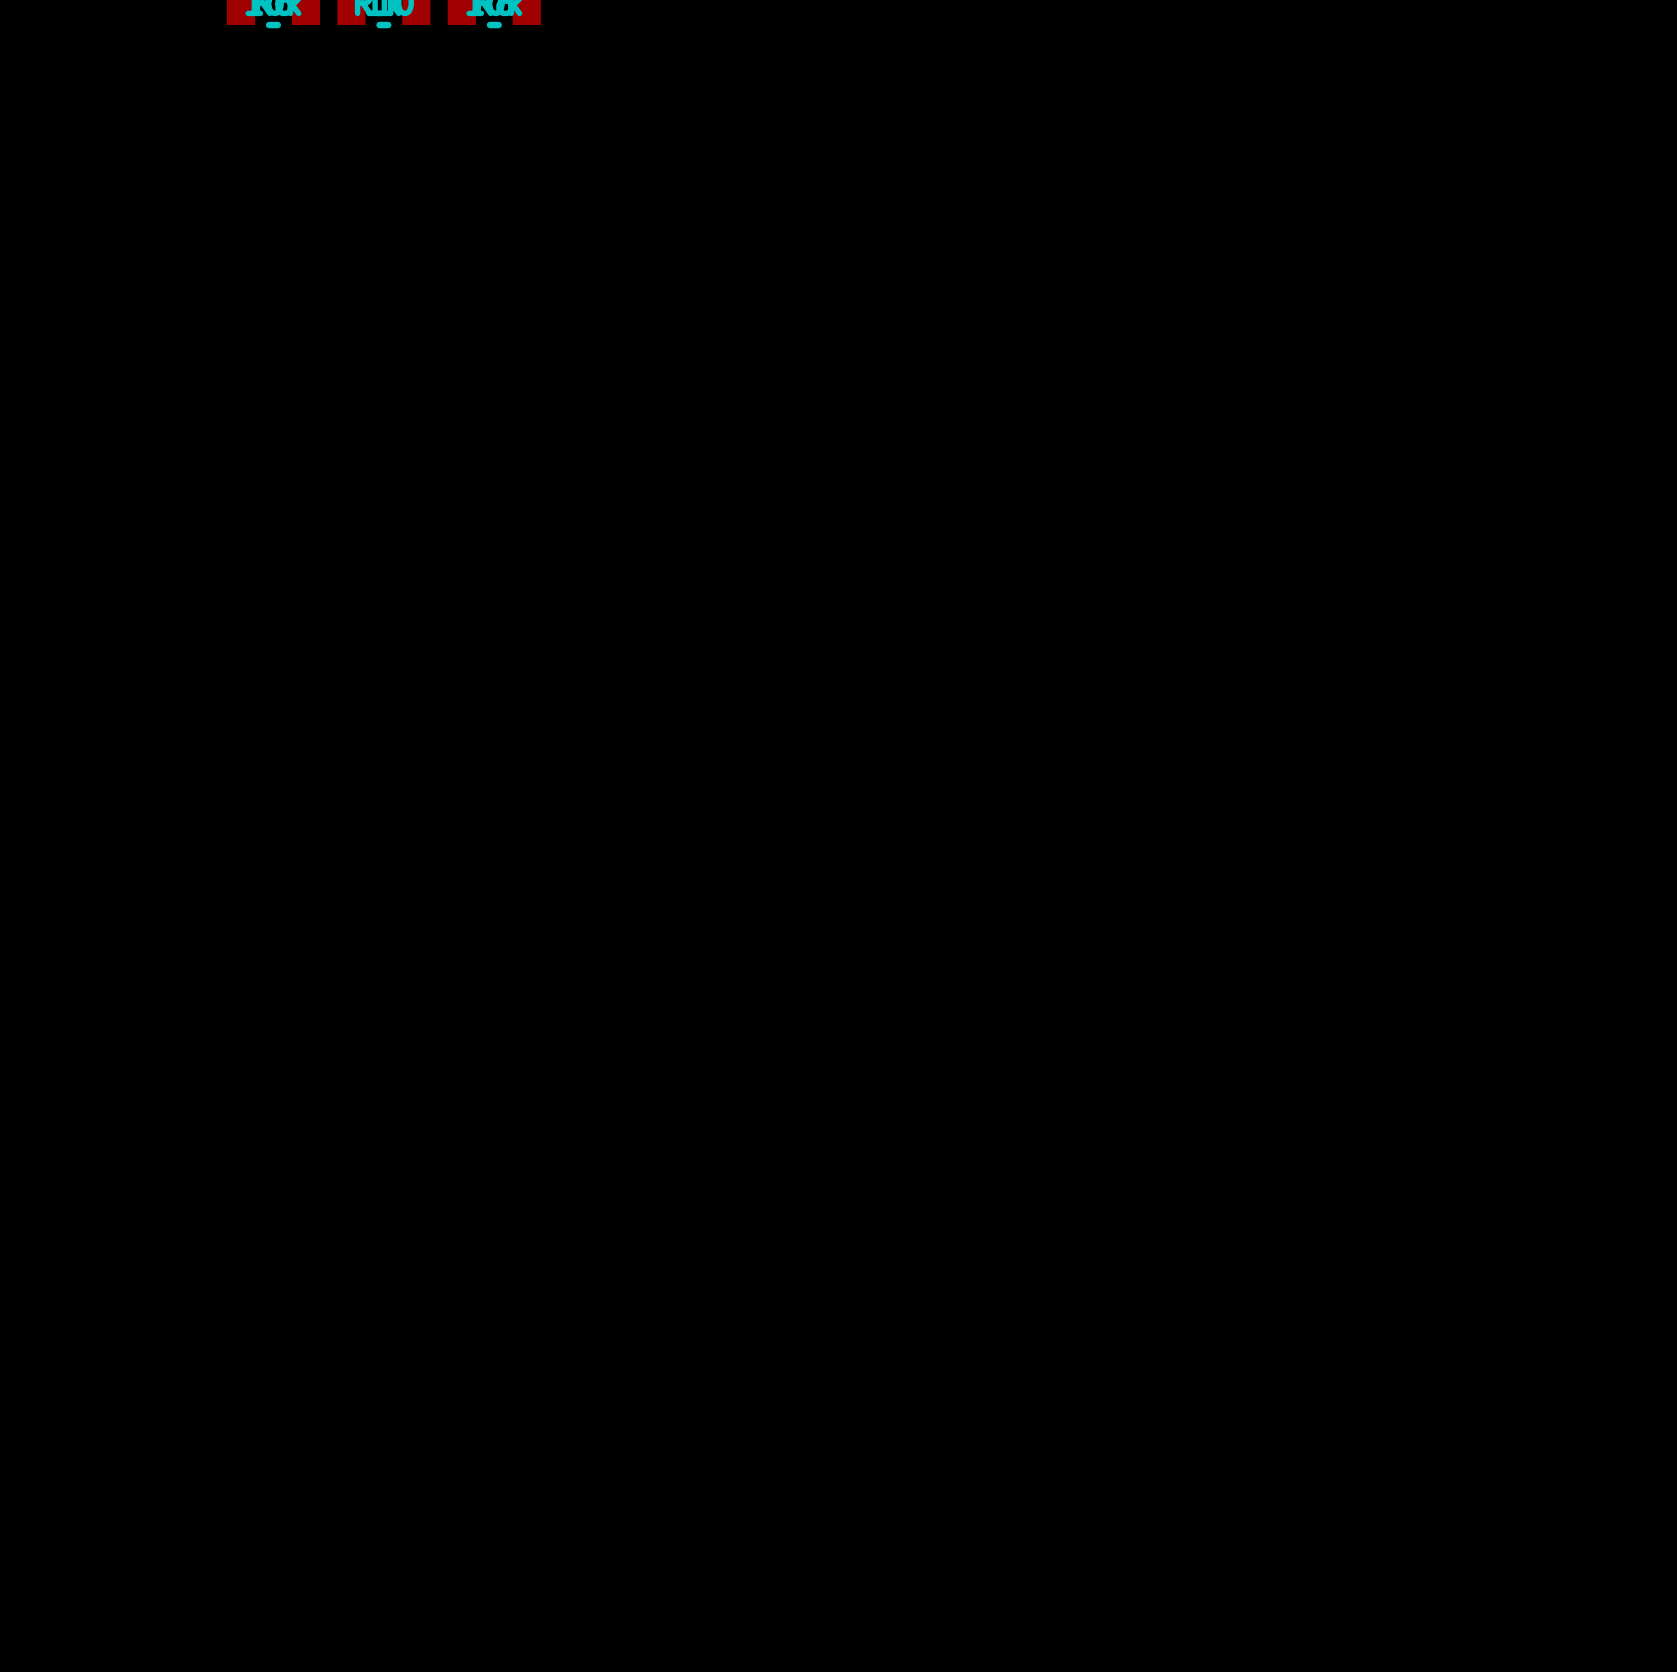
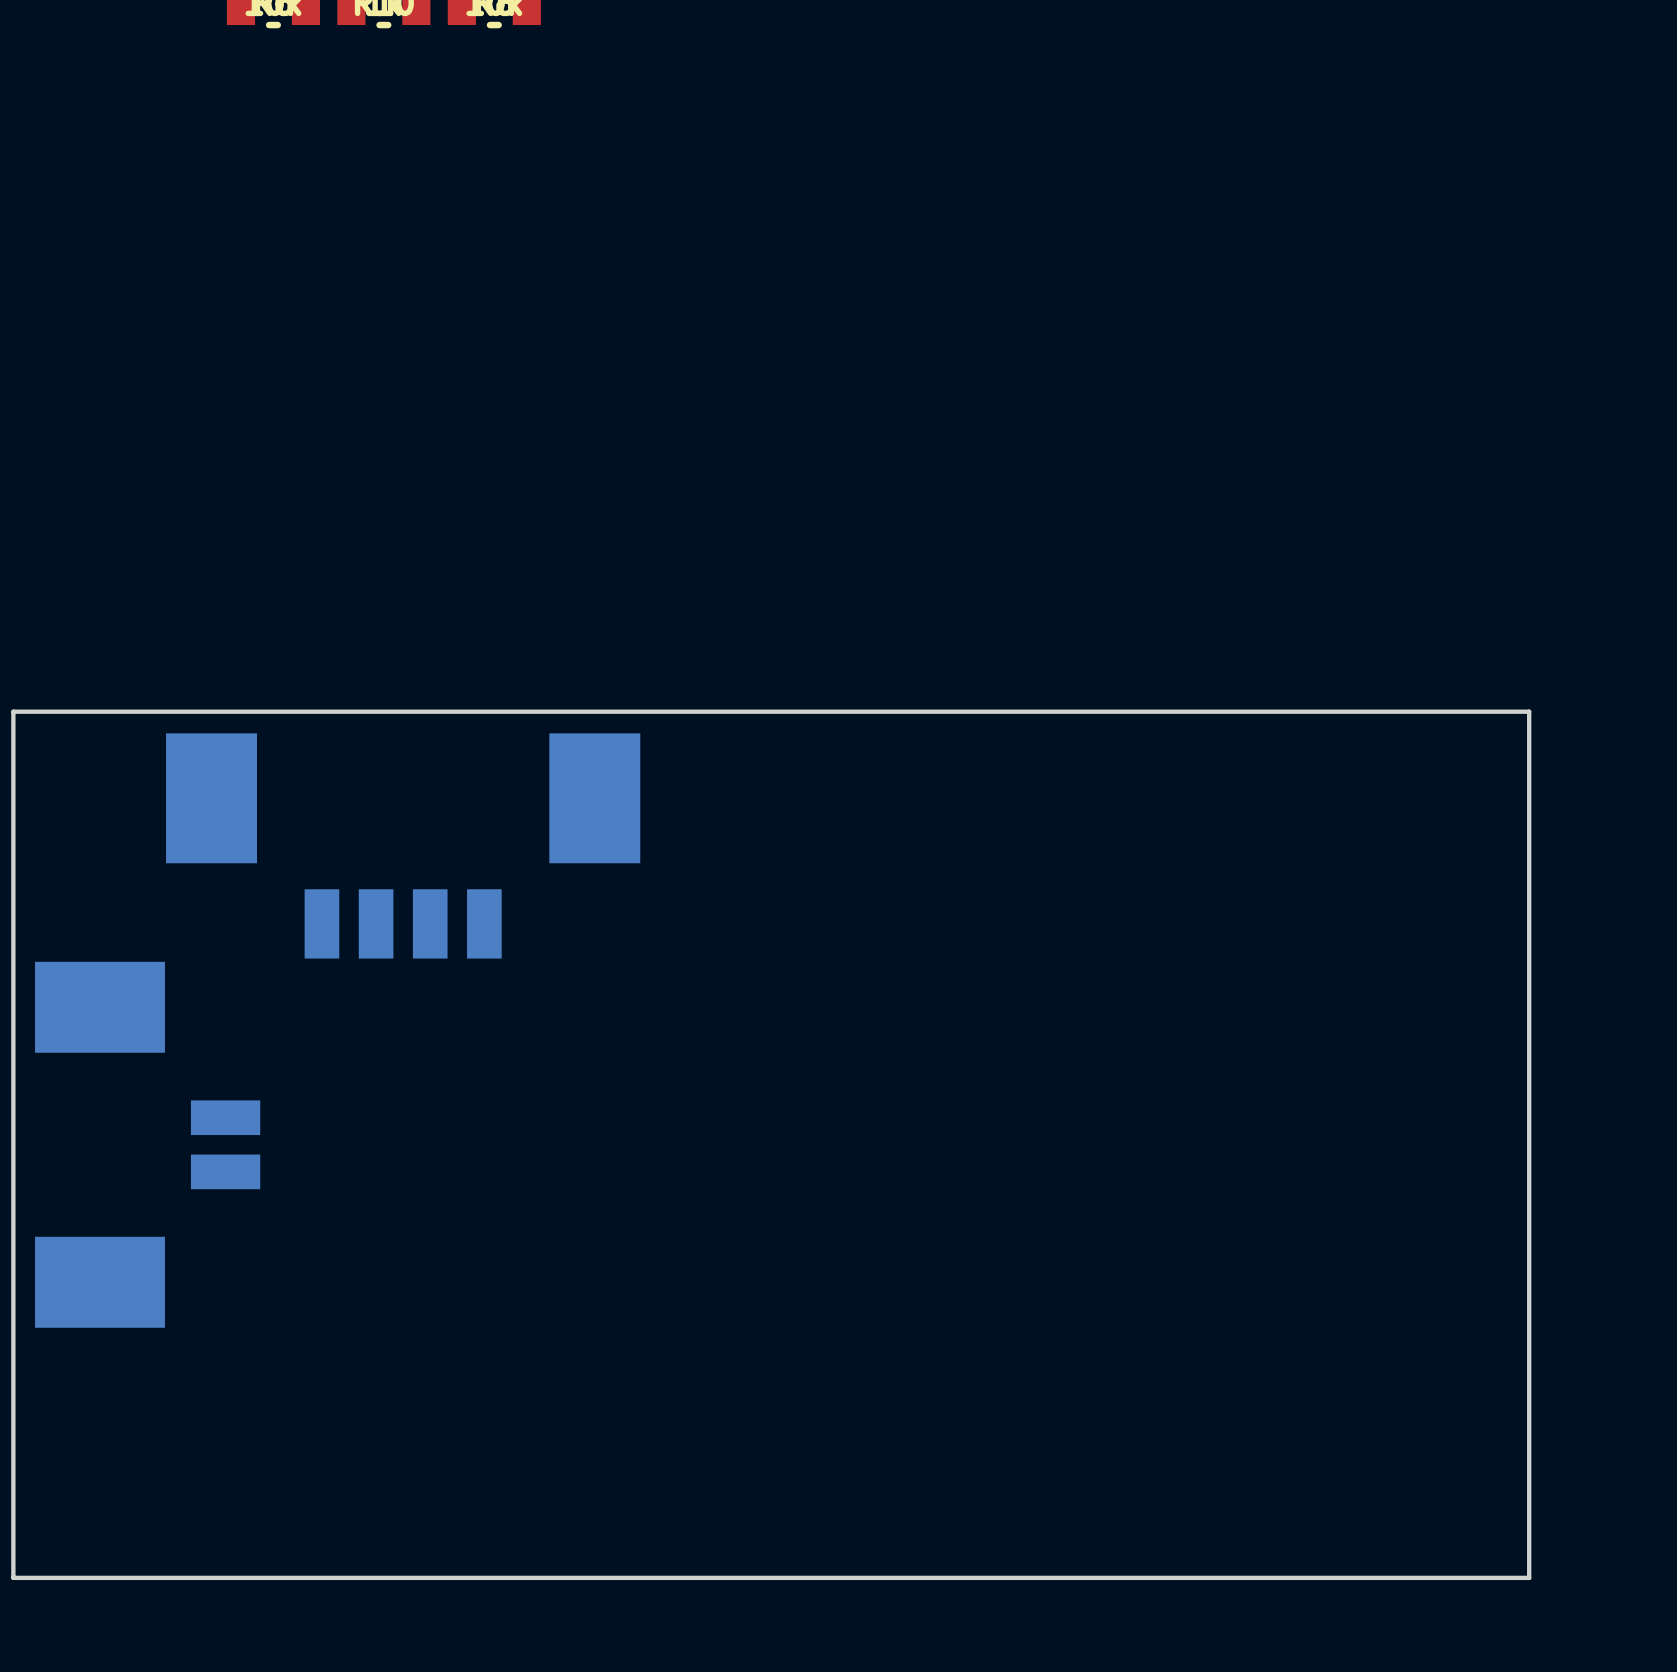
board edge: none -> (13, 711) (13, 1577) (1529, 1577) (1529, 711) (13, 711)
part: none -> (403, 845)
part: none -> (147, 1144)

